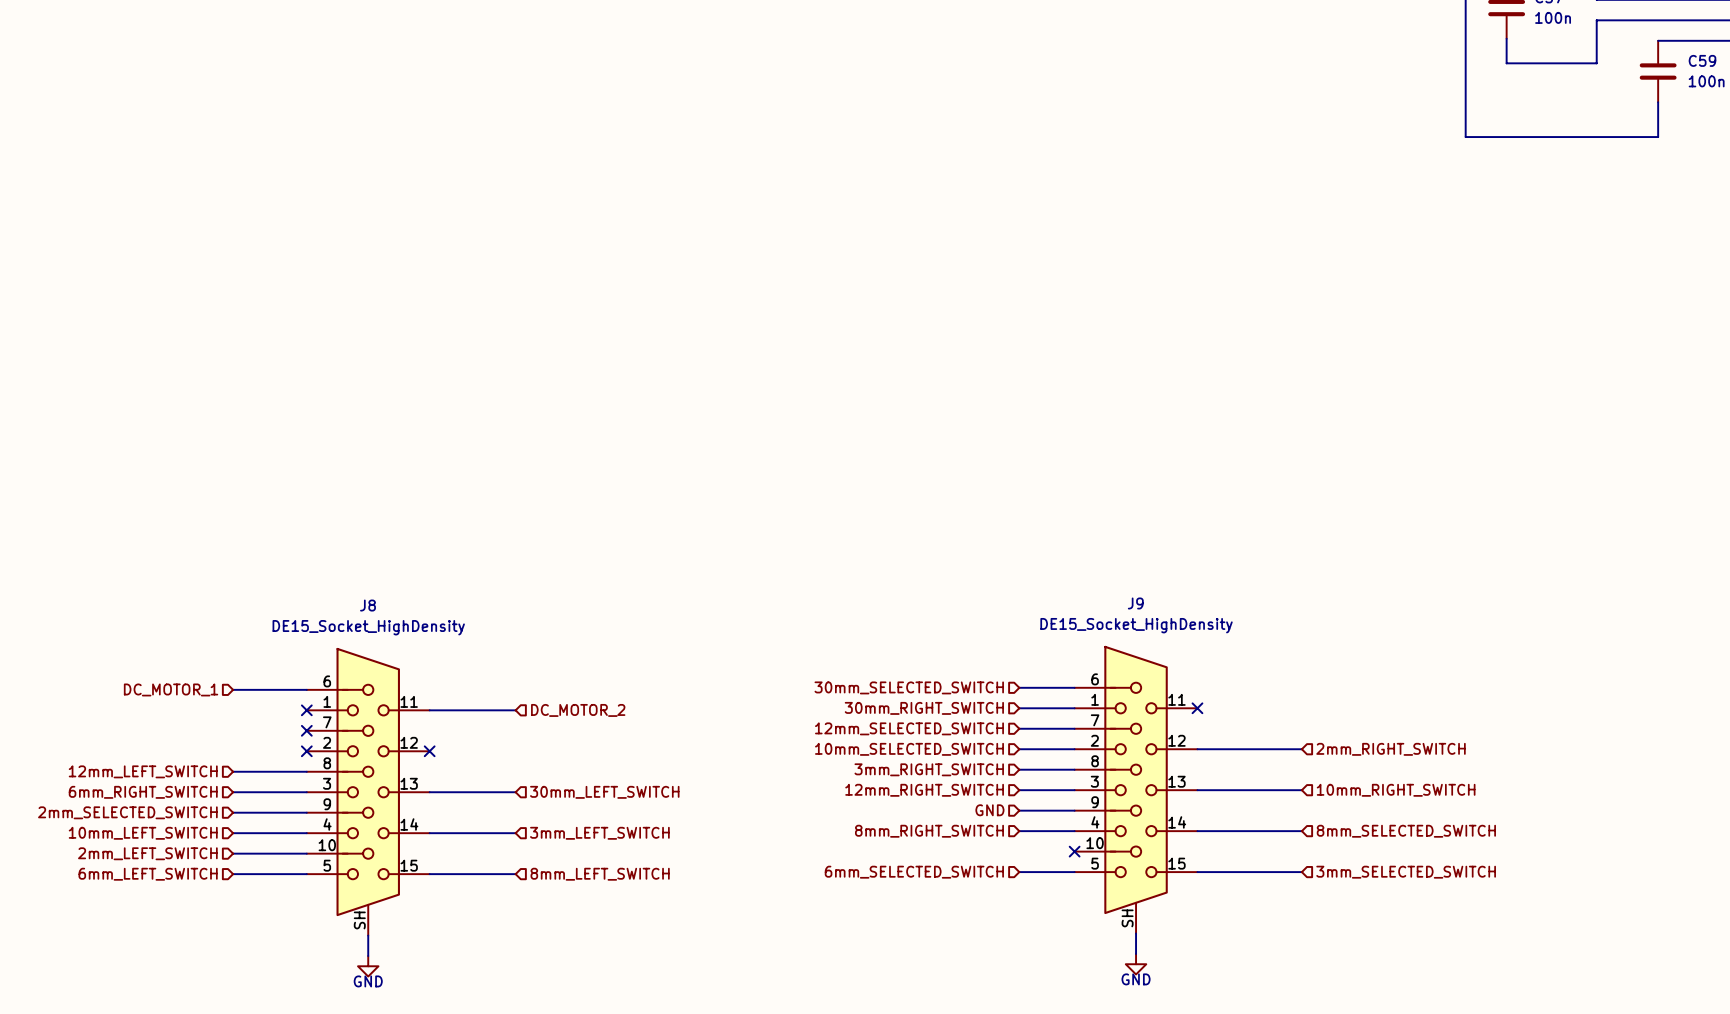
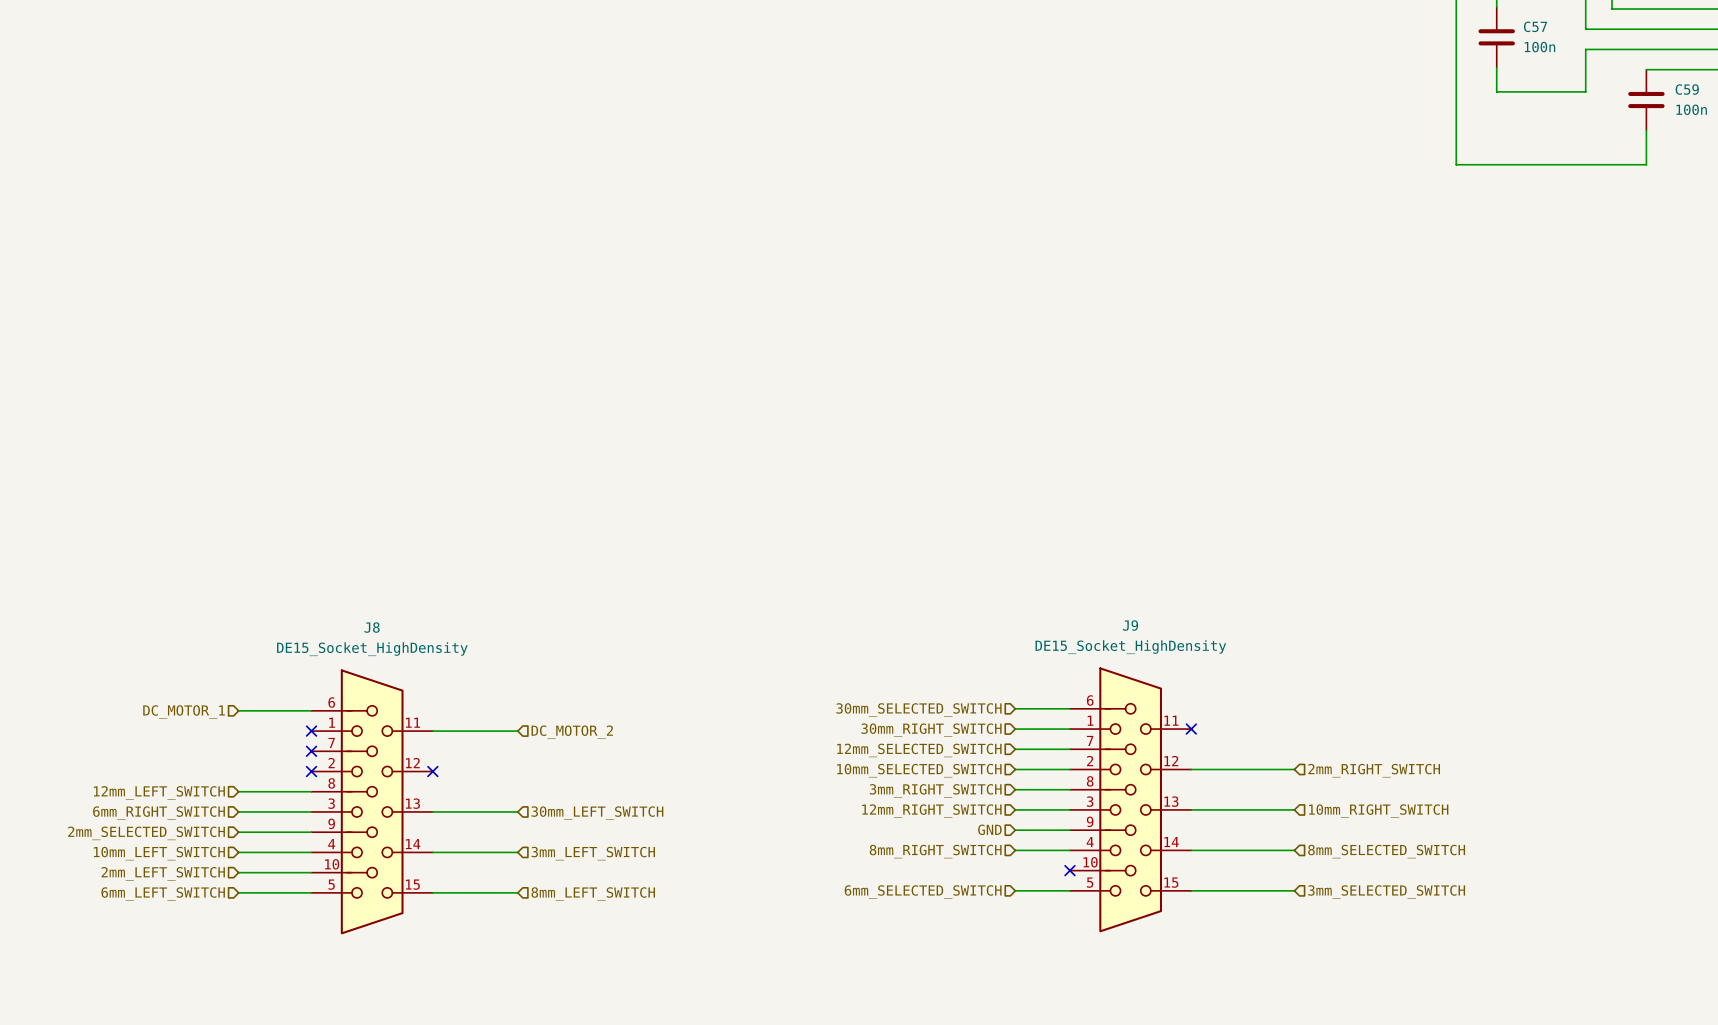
J9 symbol: [1074, 645, 1198, 934] -> [1069, 667, 1192, 933]
J8 symbol: [306, 647, 430, 936] -> [311, 669, 433, 935]
wire: (1136, 933) (1136, 953) -> none
wire: (368, 935) (368, 956) -> none
power symbol: GND (1136, 964) -> none
power symbol: GND (368, 966) -> none

